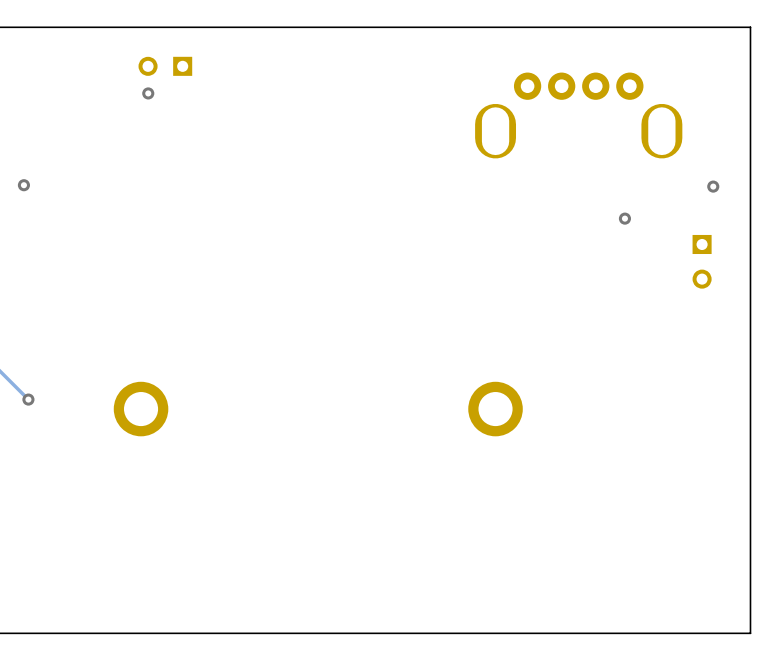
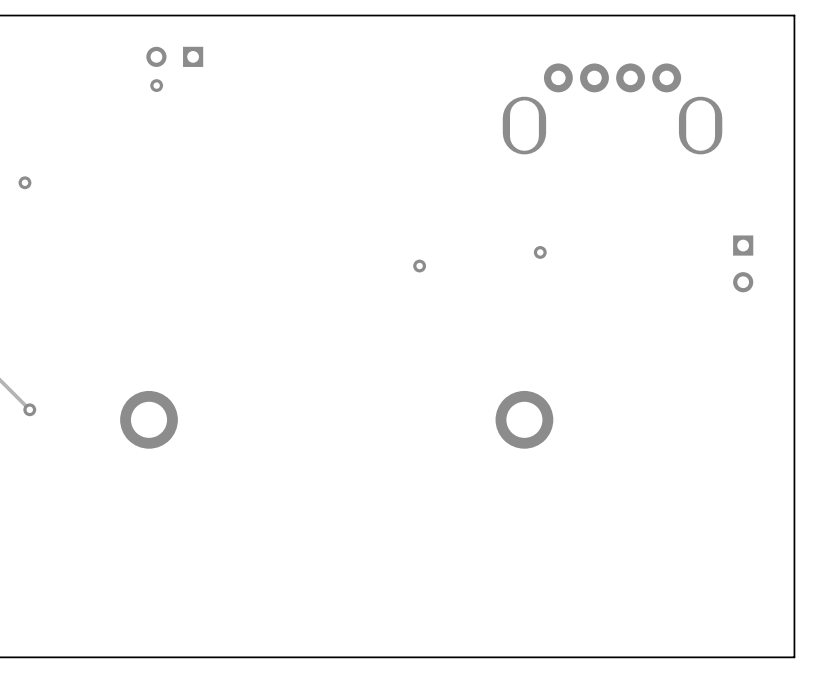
via: (713, 186) -> none
via: (624, 218) -> none
via: none -> (540, 252)
via: none -> (419, 266)

